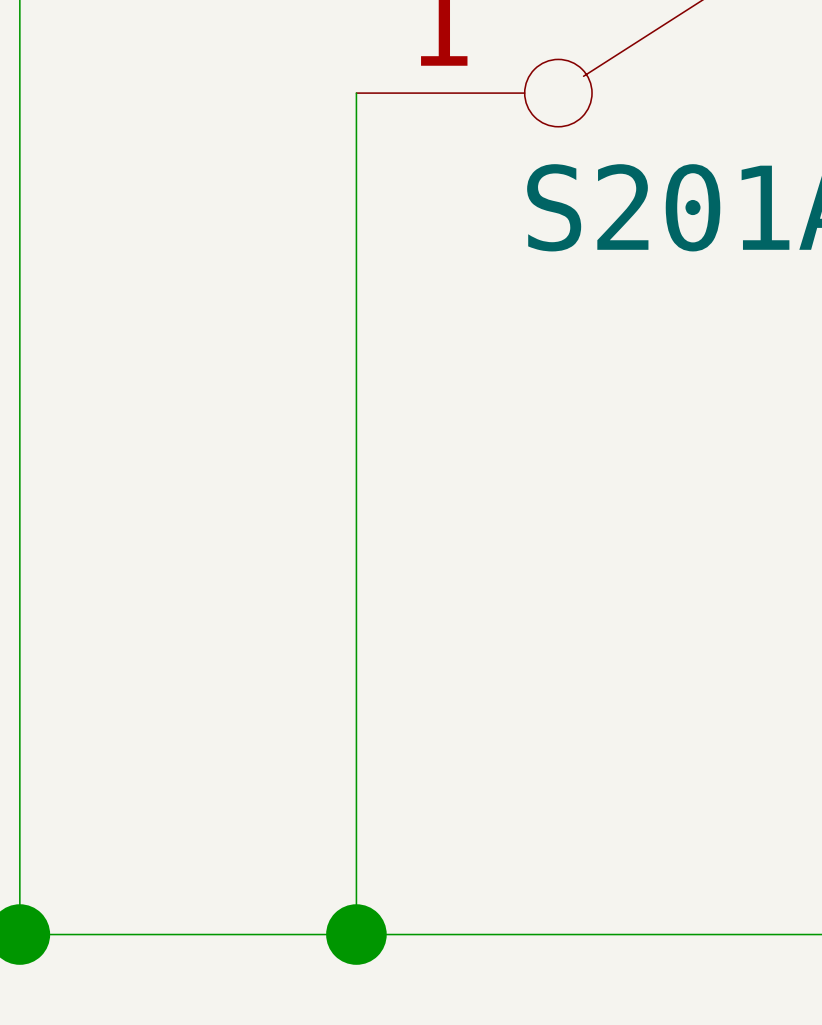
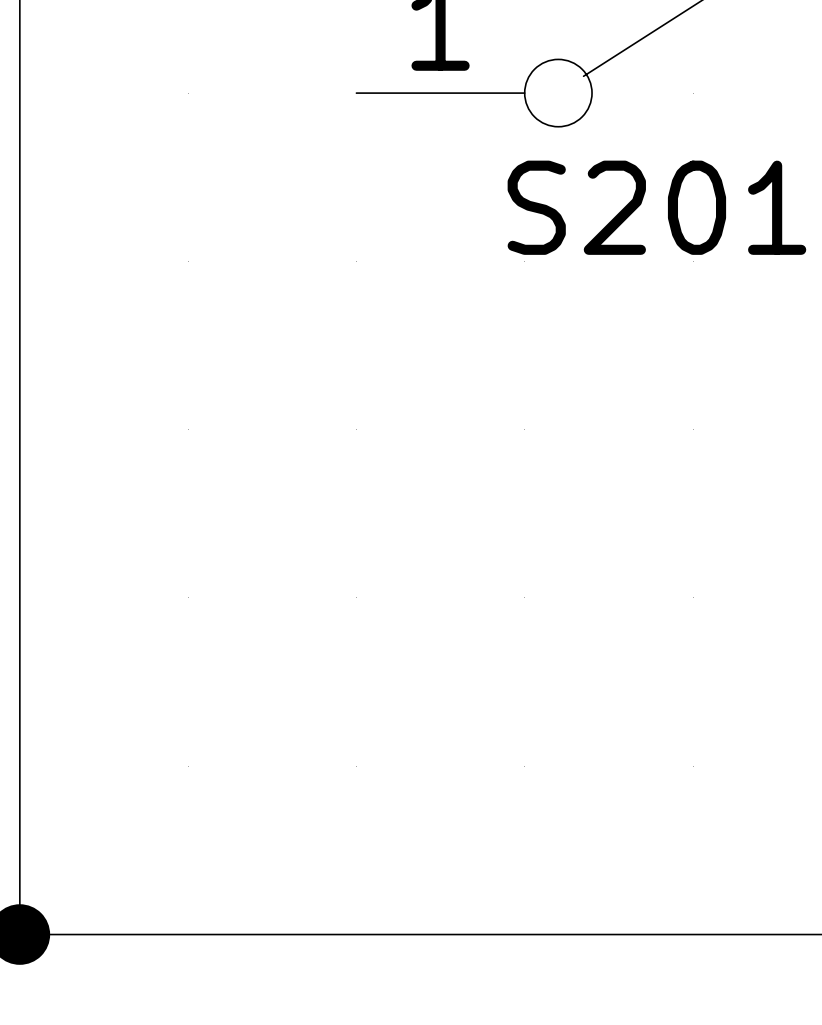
wire: (356, 93) (356, 934) -> none
junction: (356, 934) -> none

